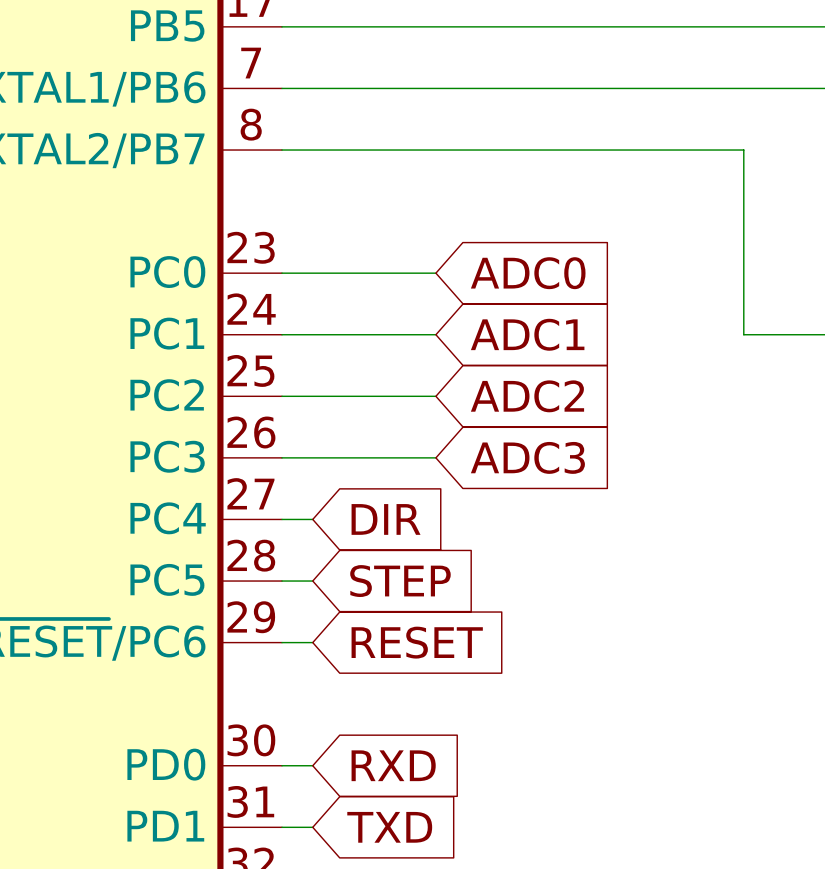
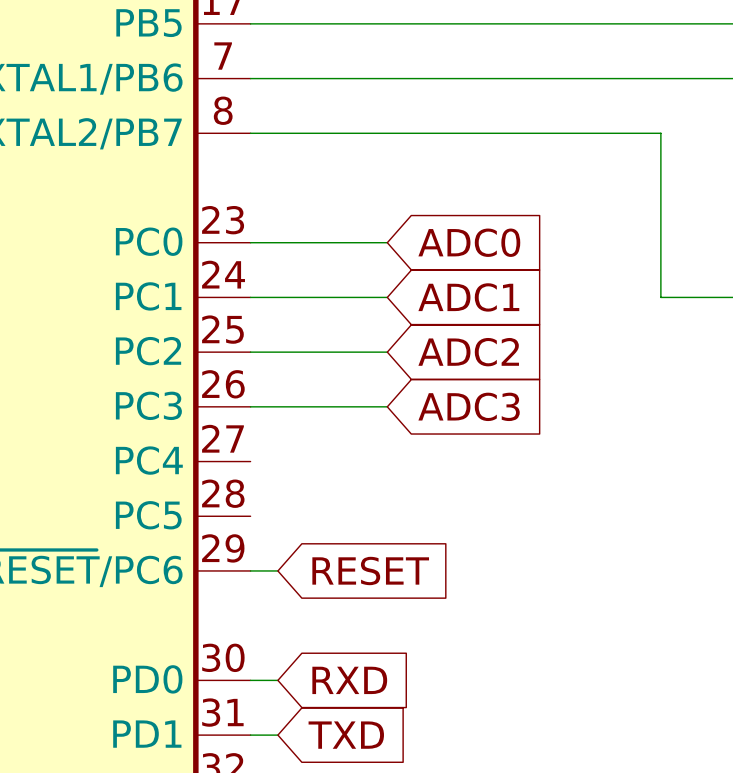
wire: (281, 519) (312, 519) -> none
global label: DIR (386, 519) -> none
wire: (281, 581) (312, 581) -> none
global label: STEP (400, 581) -> none

